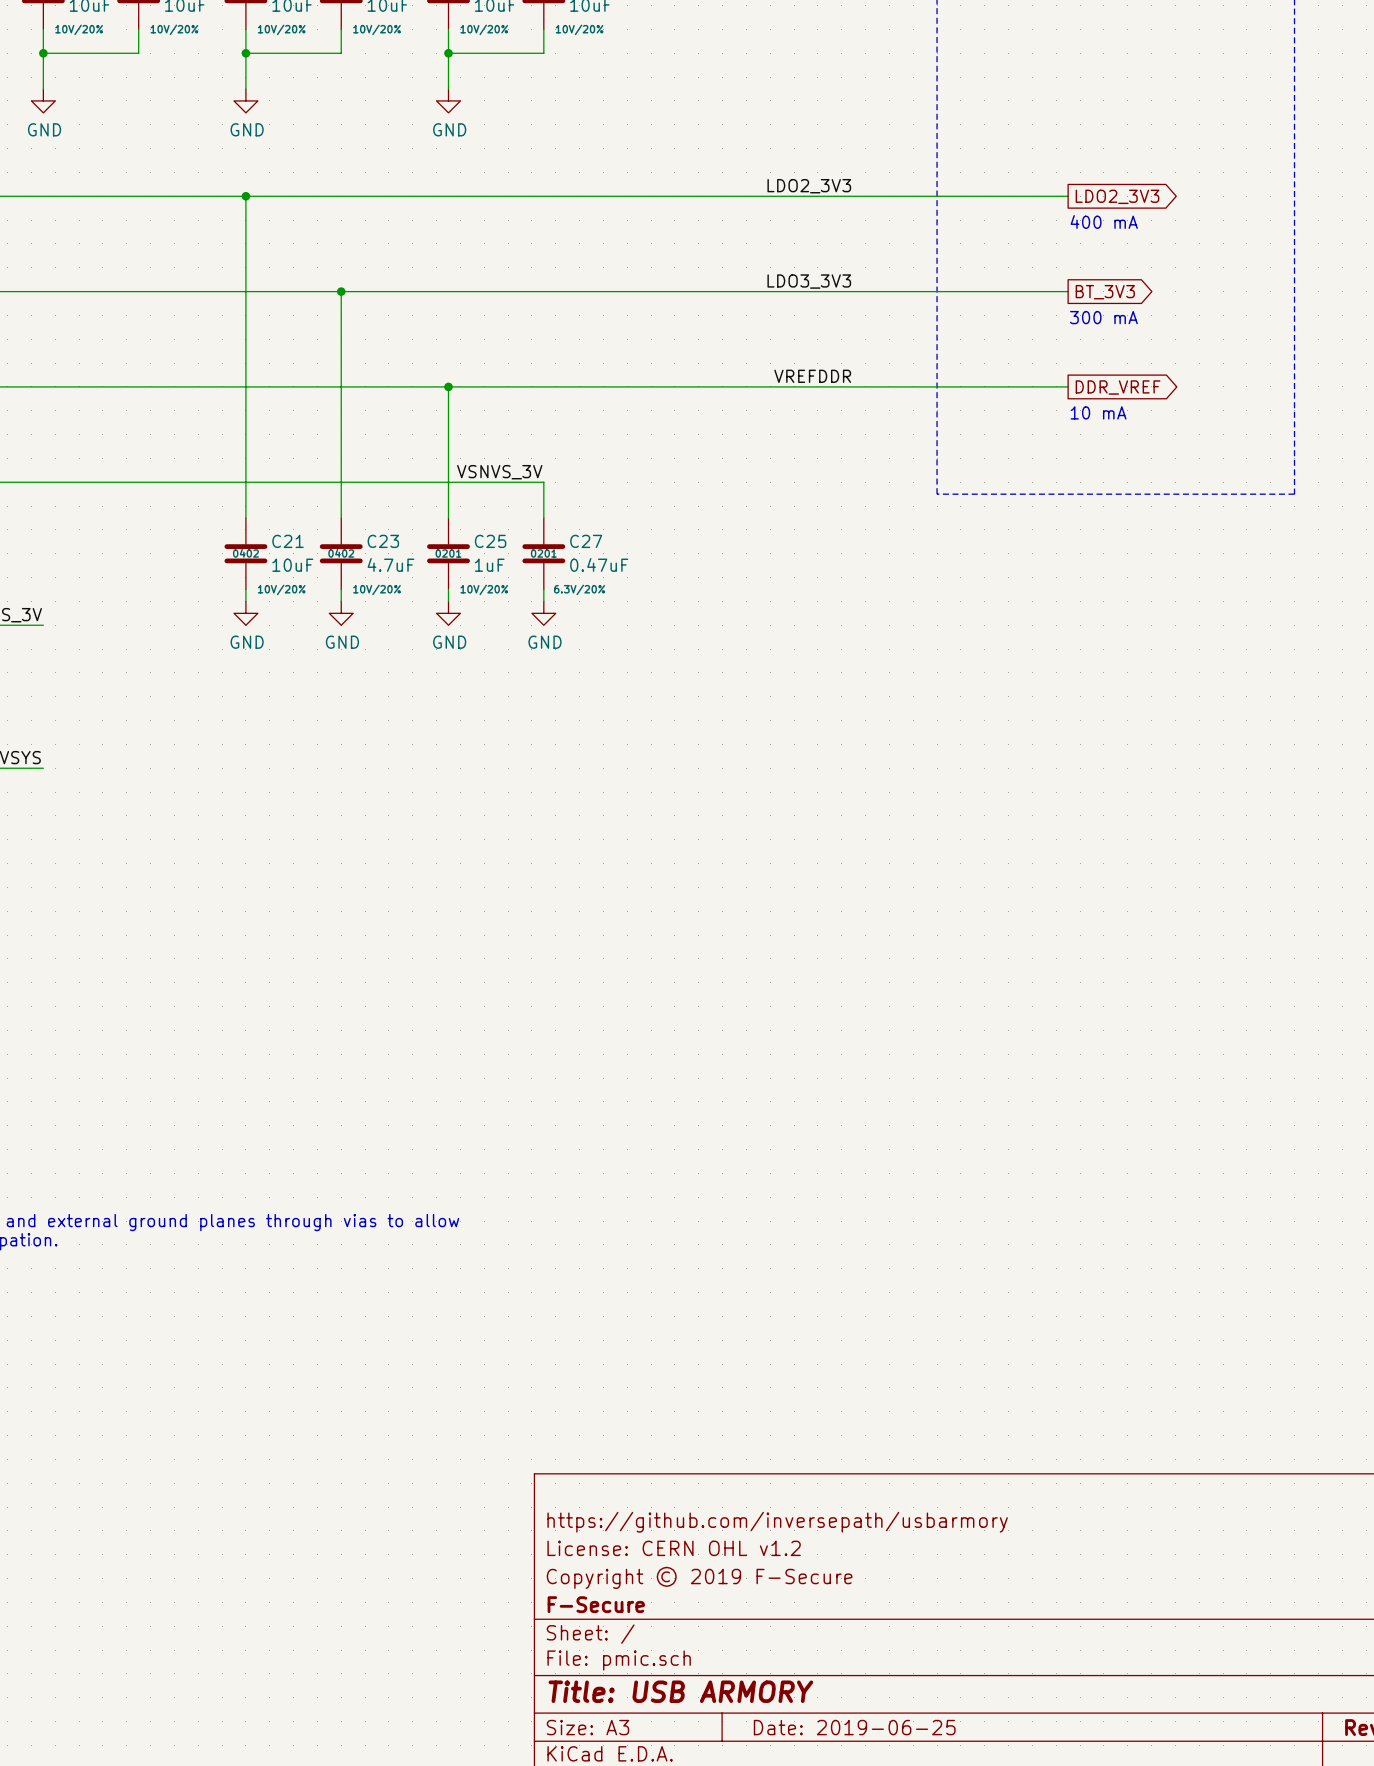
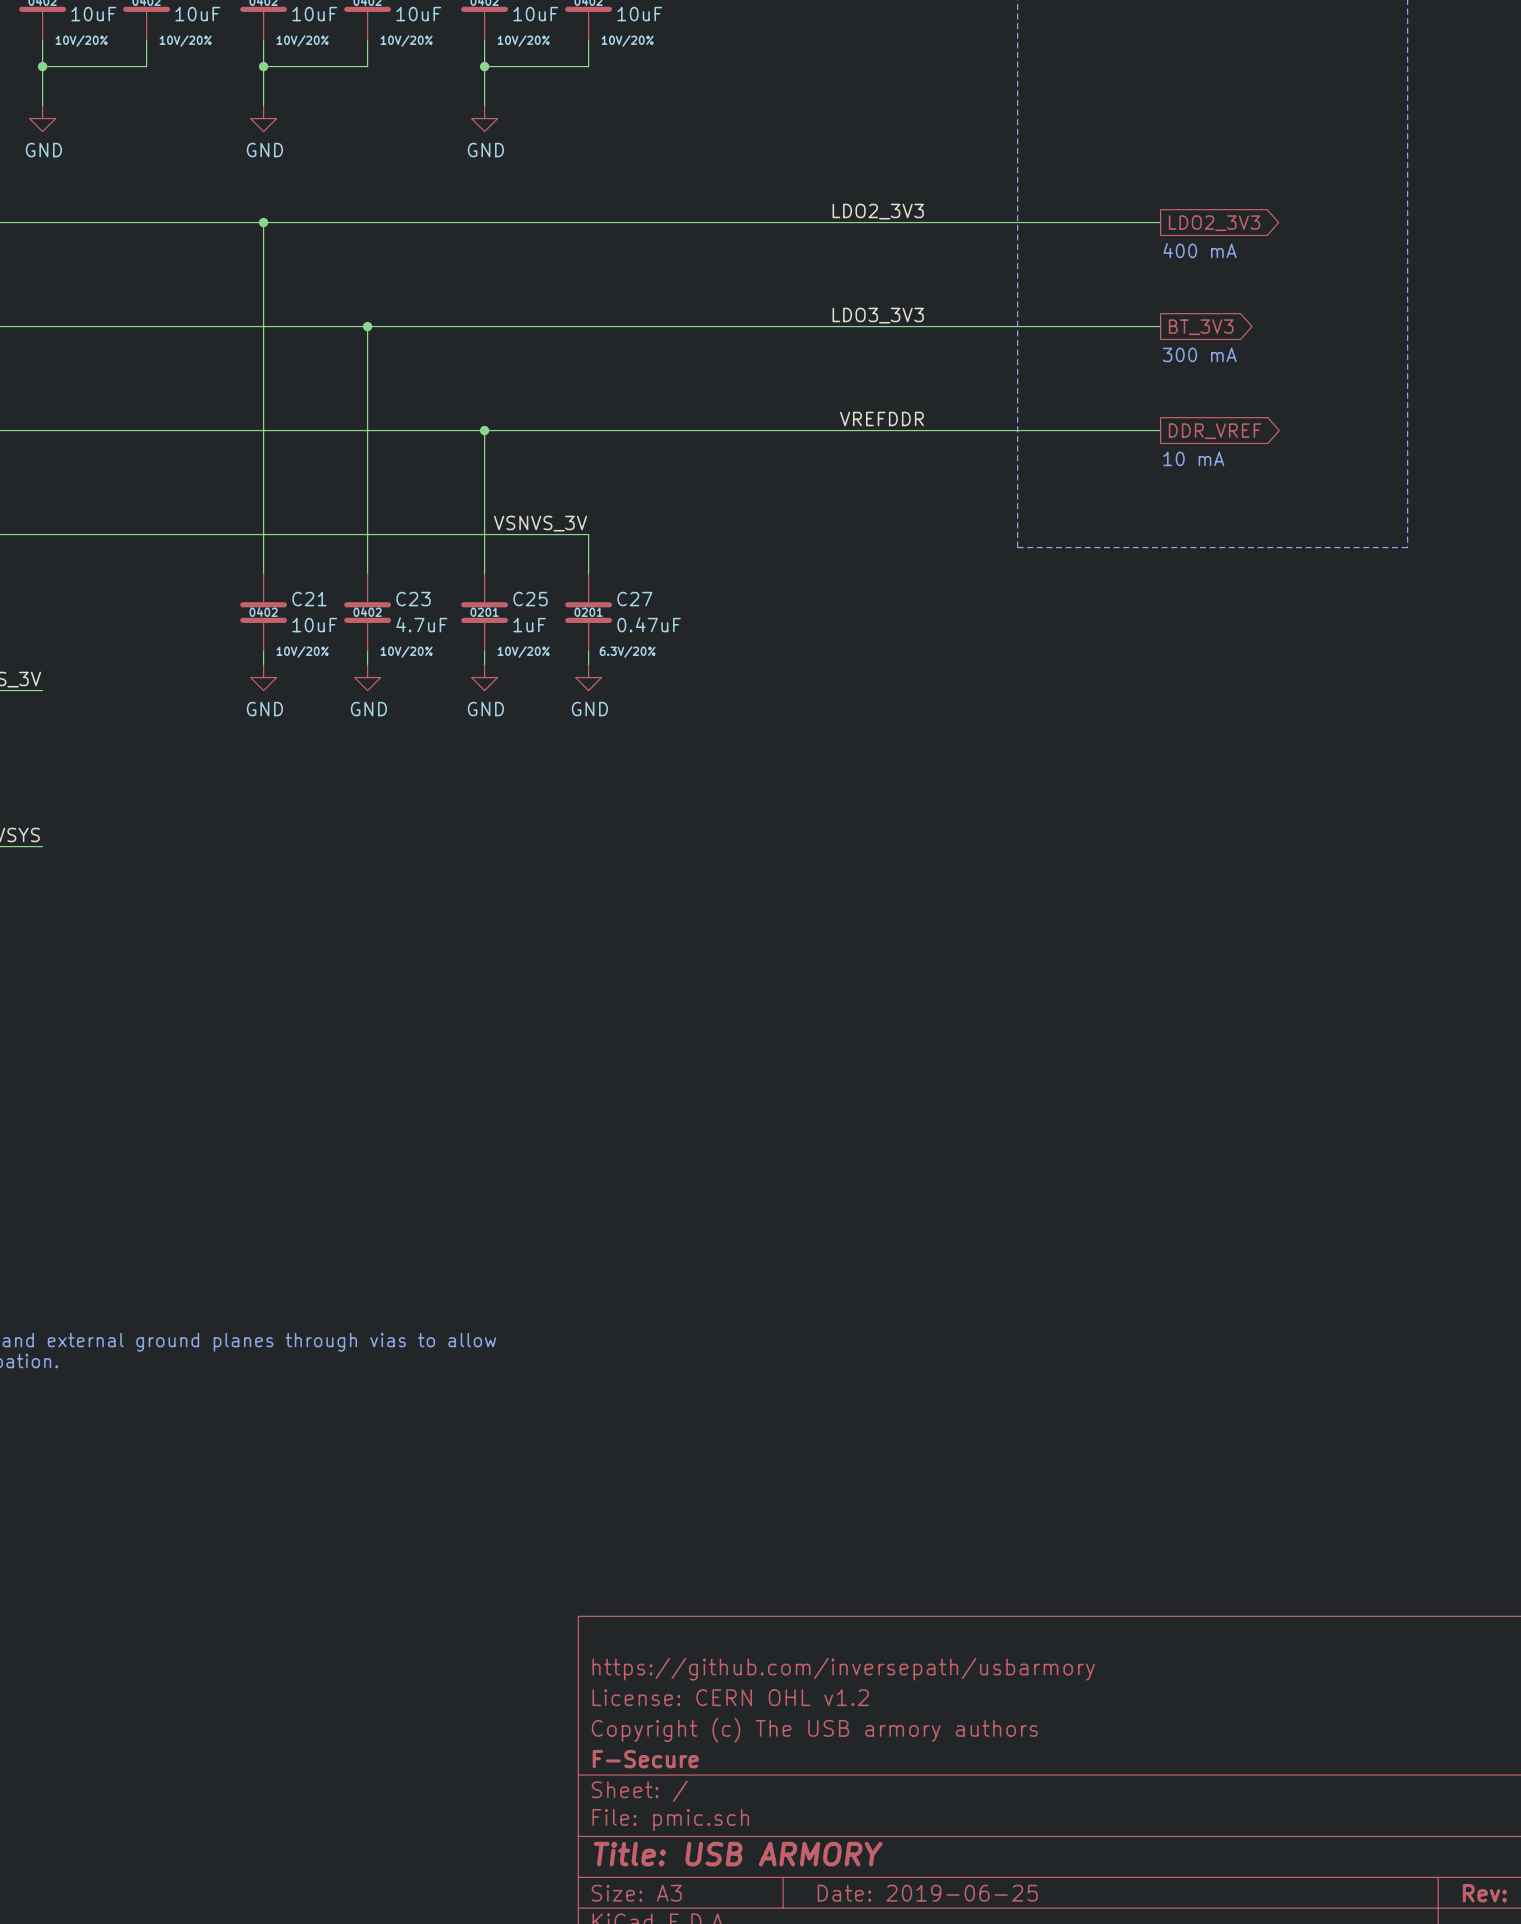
title block: Copyright © 2019 F-Secure (699, 1577) -> Copyright (c) The USB armory authors (814, 1730)

